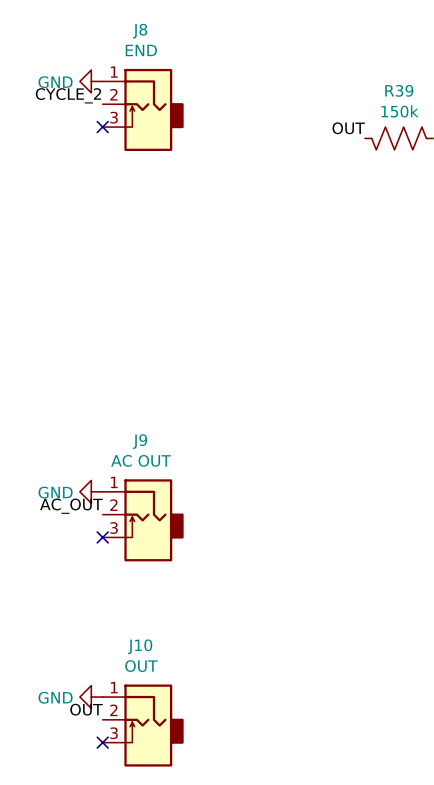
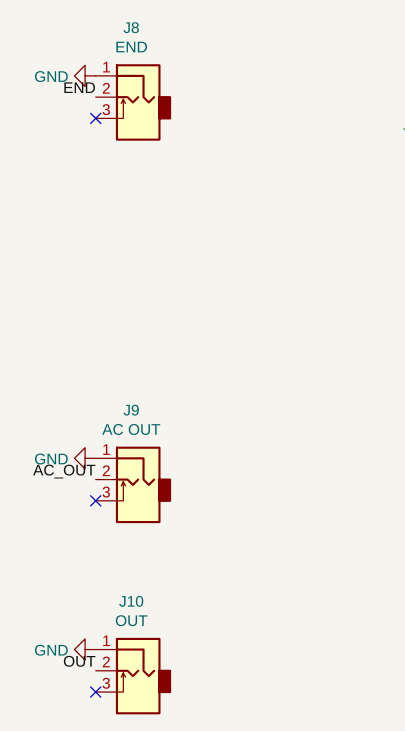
label: CYCLE_2 (68, 95) -> END (79, 87)
label: OUT (348, 128) -> none
R39: 150k (399, 138) -> none

